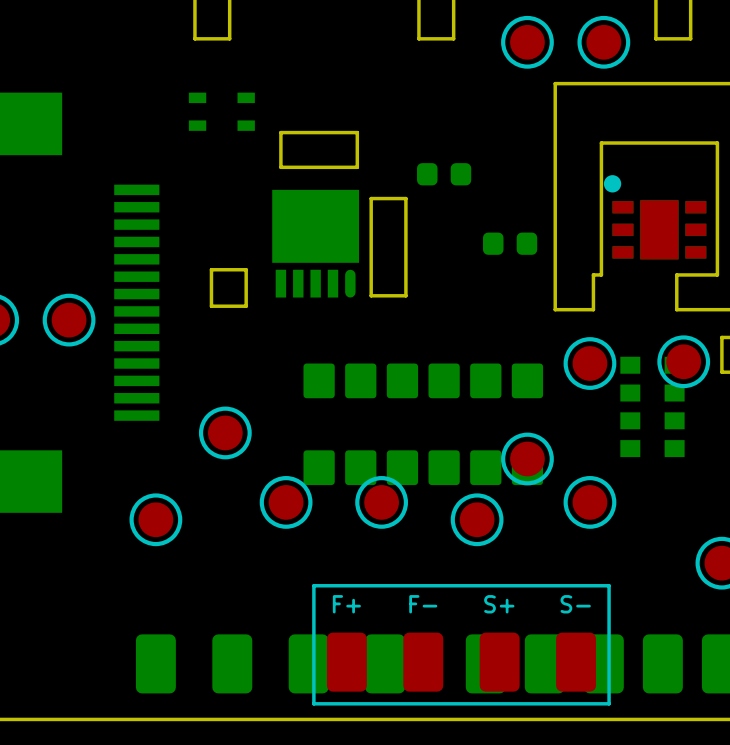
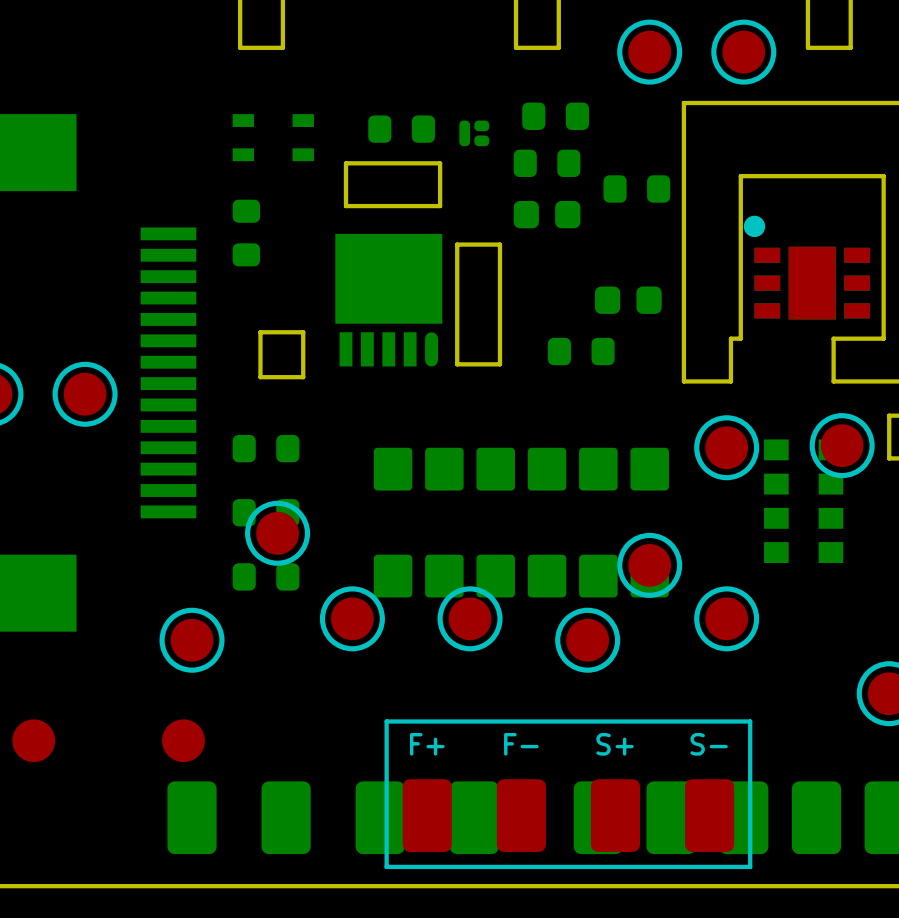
part: none -> (555, 116)
part: none -> (401, 129)
part: none -> (474, 133)
part: none -> (547, 163)
part: none -> (636, 188)
part: none -> (246, 233)
part: none -> (581, 351)
part: none -> (266, 448)
part: none -> (266, 512)
part: none -> (266, 576)
part: none -> (33, 740)
part: none -> (183, 740)

